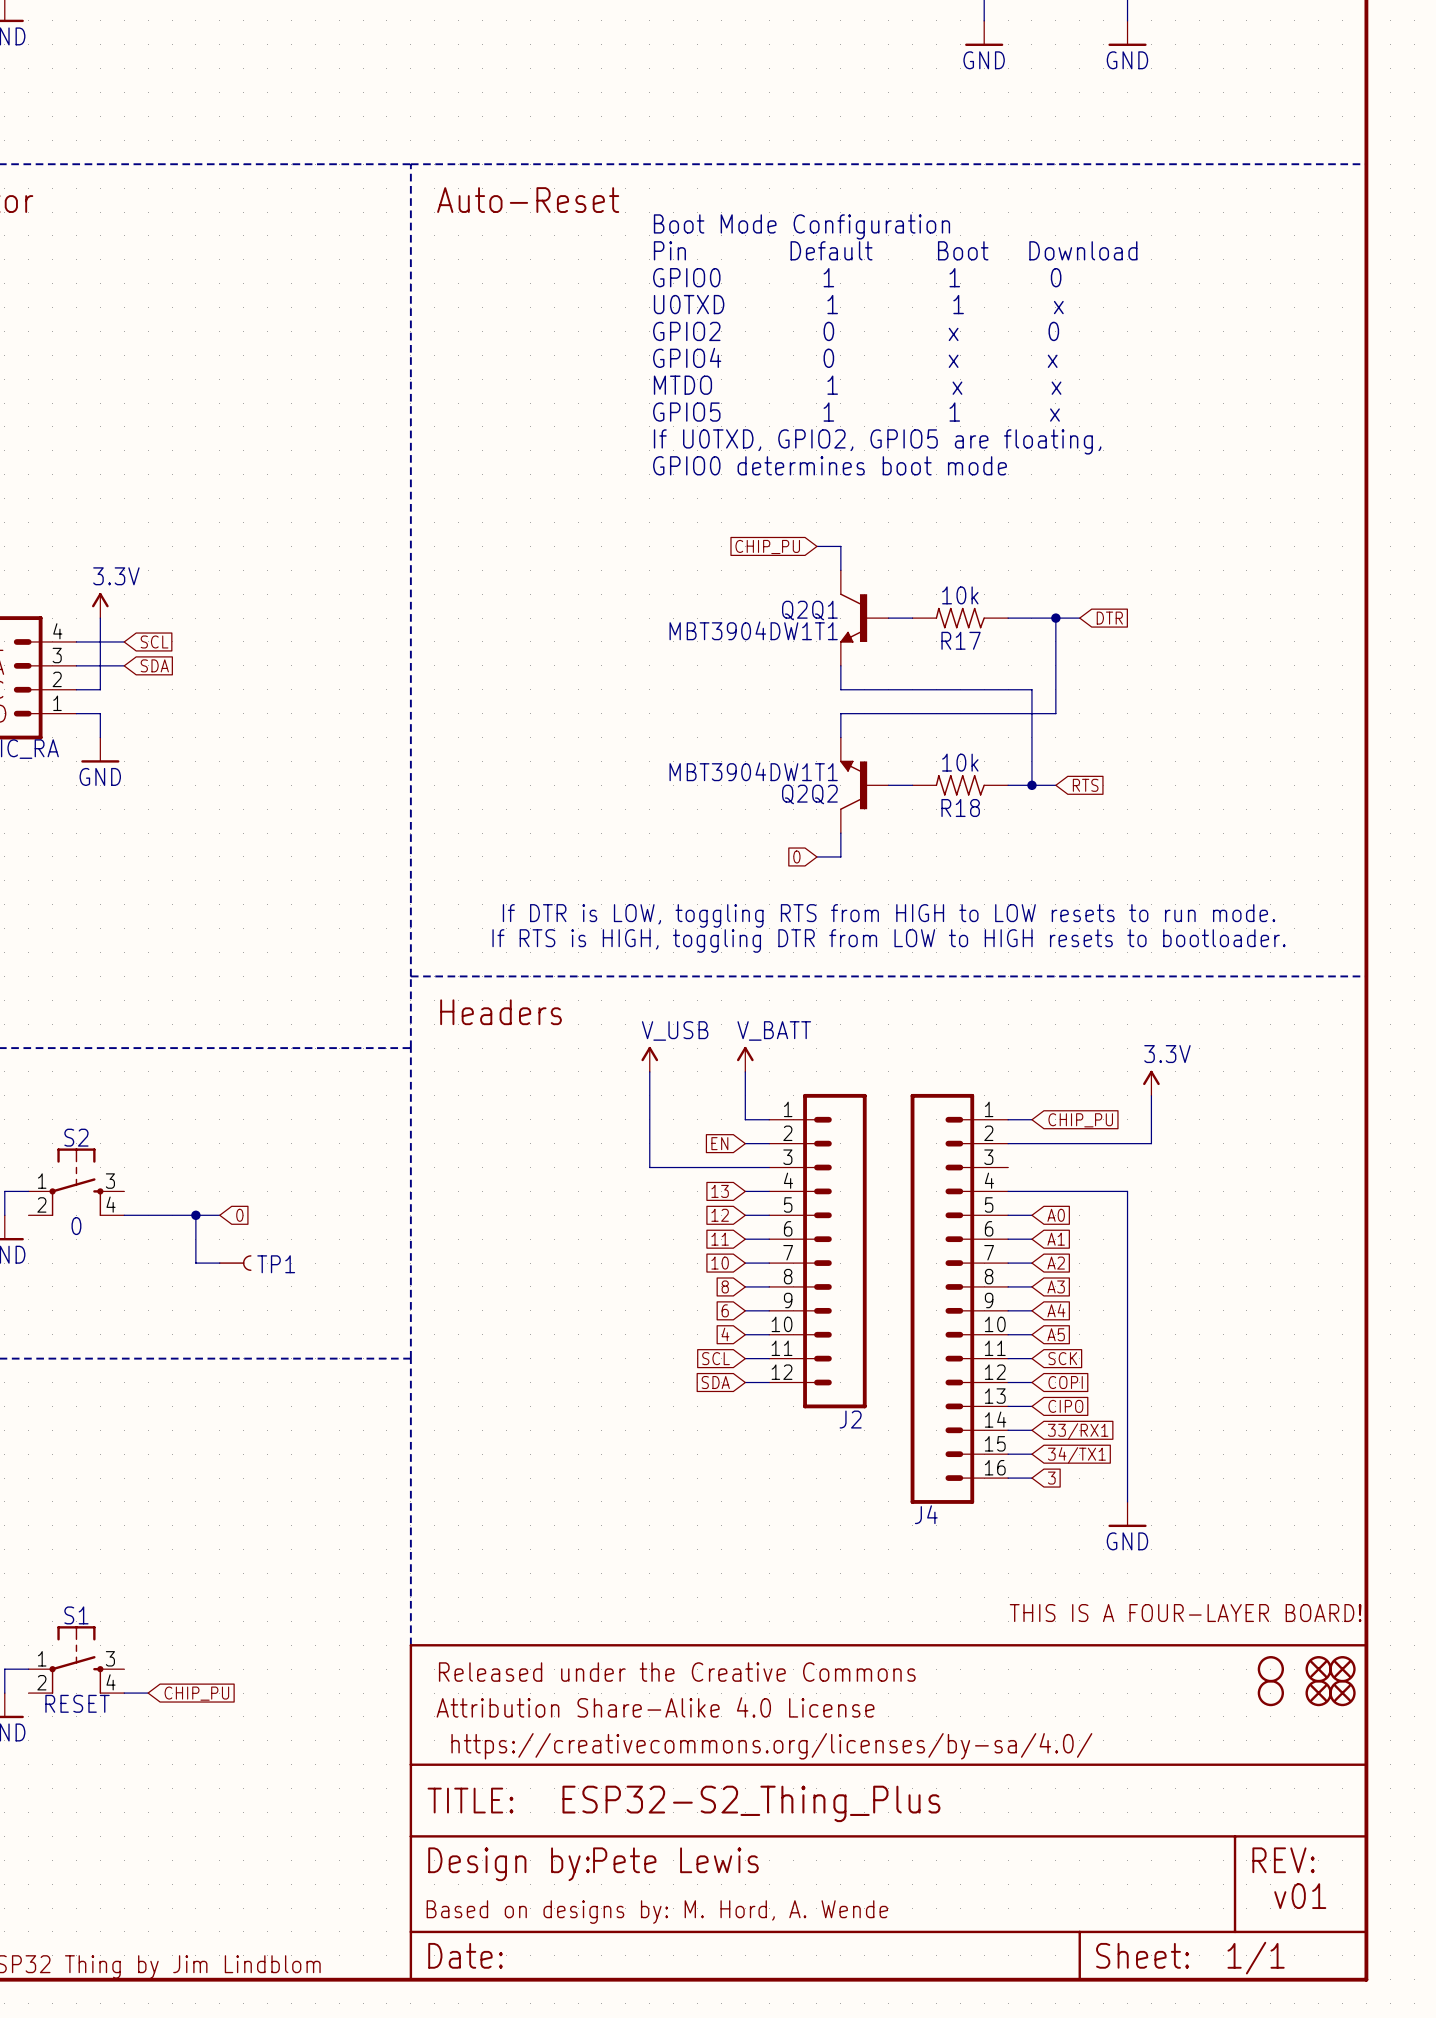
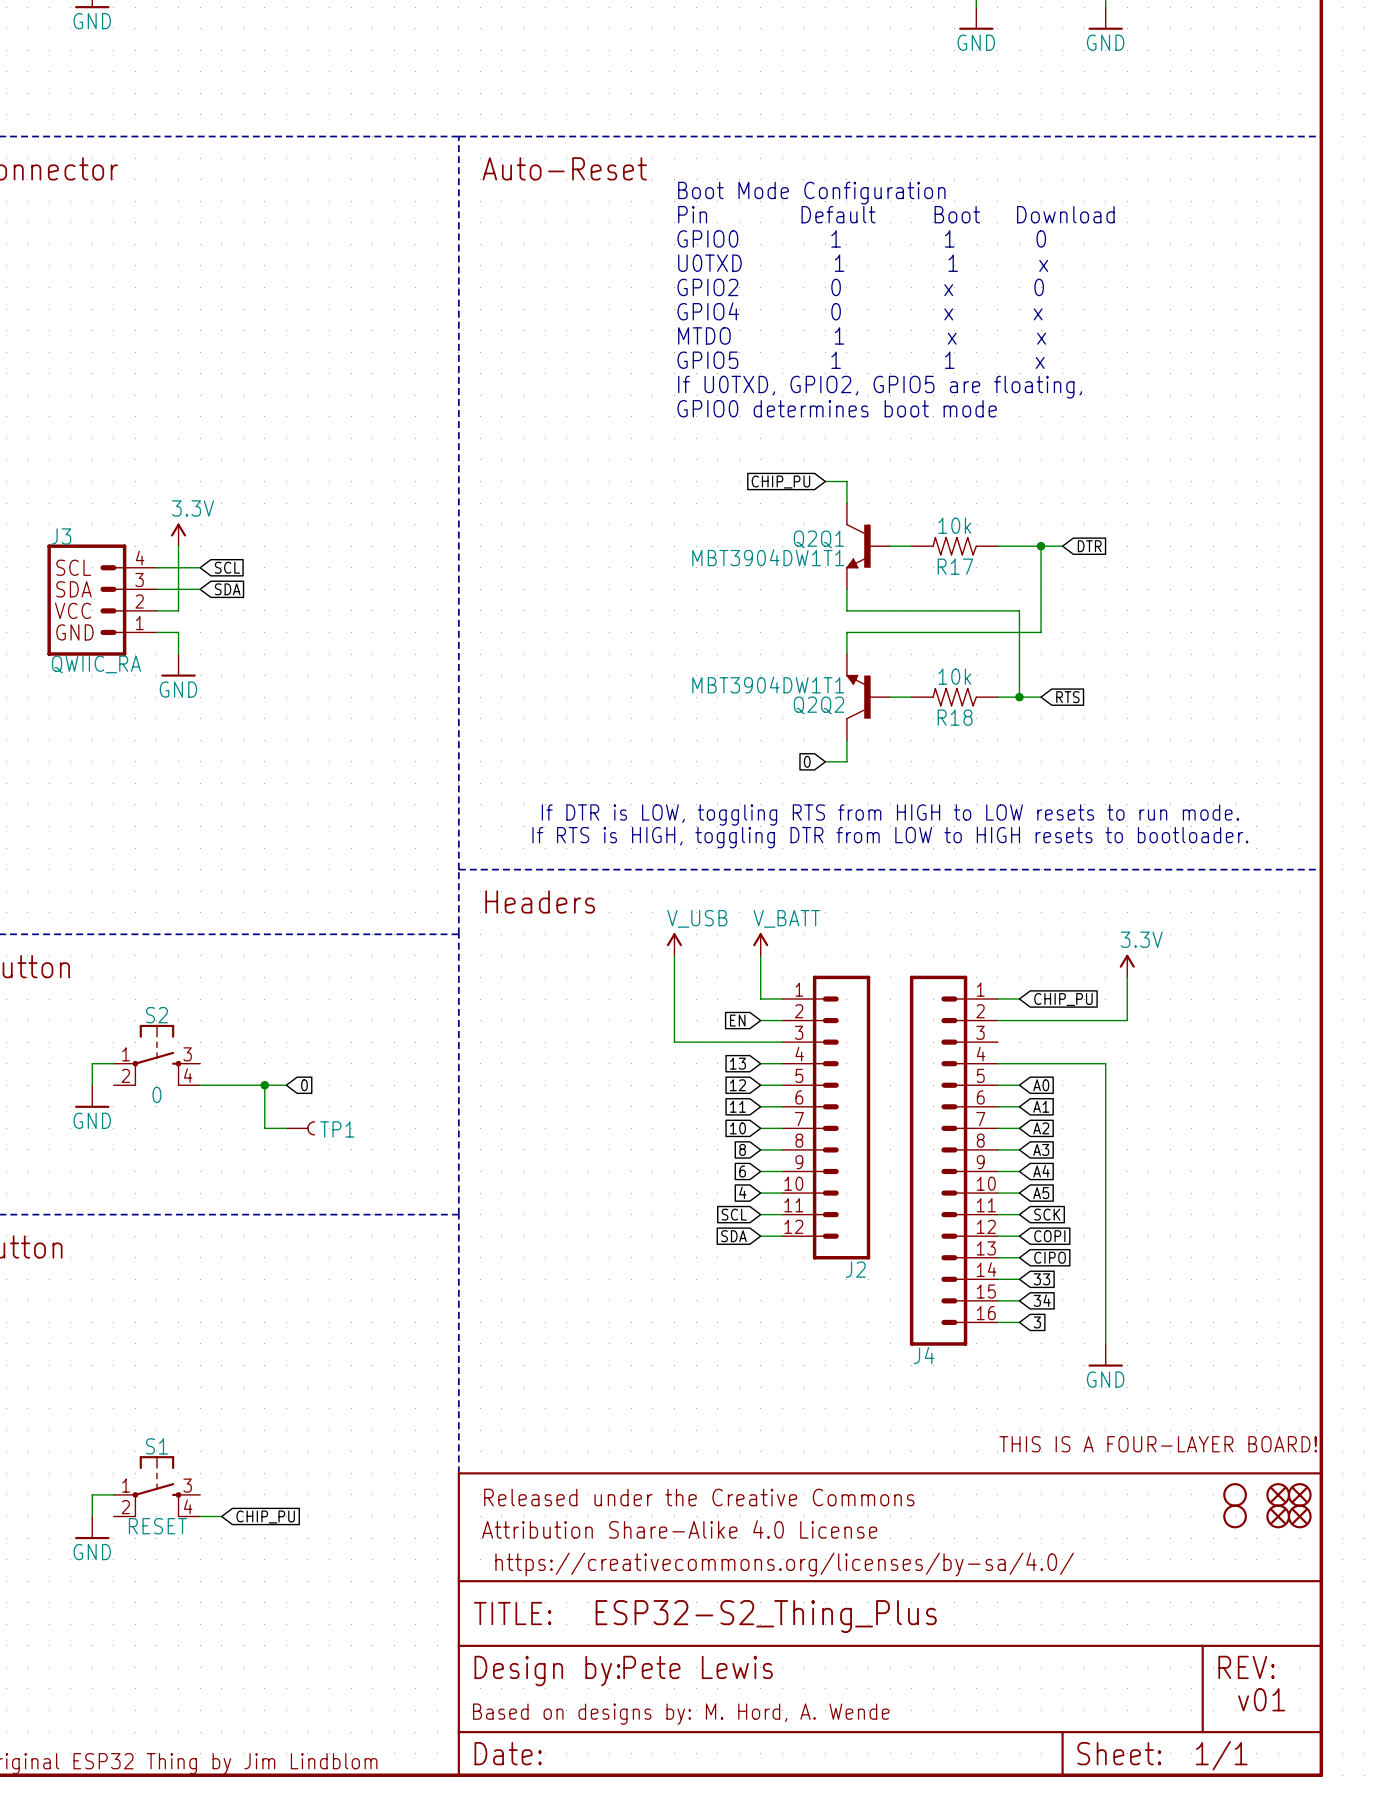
global label: 33/RX1 (1078, 1431) -> 33 (1041, 1279)
global label: 34/TX1 (1076, 1455) -> 34 (1042, 1300)

